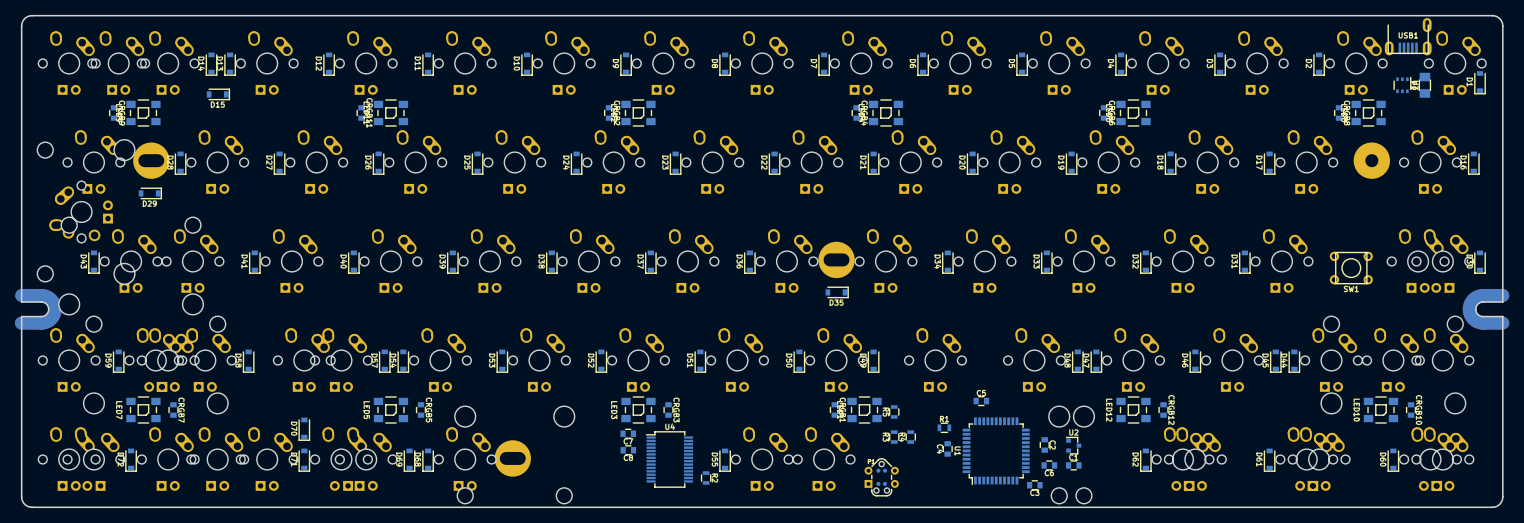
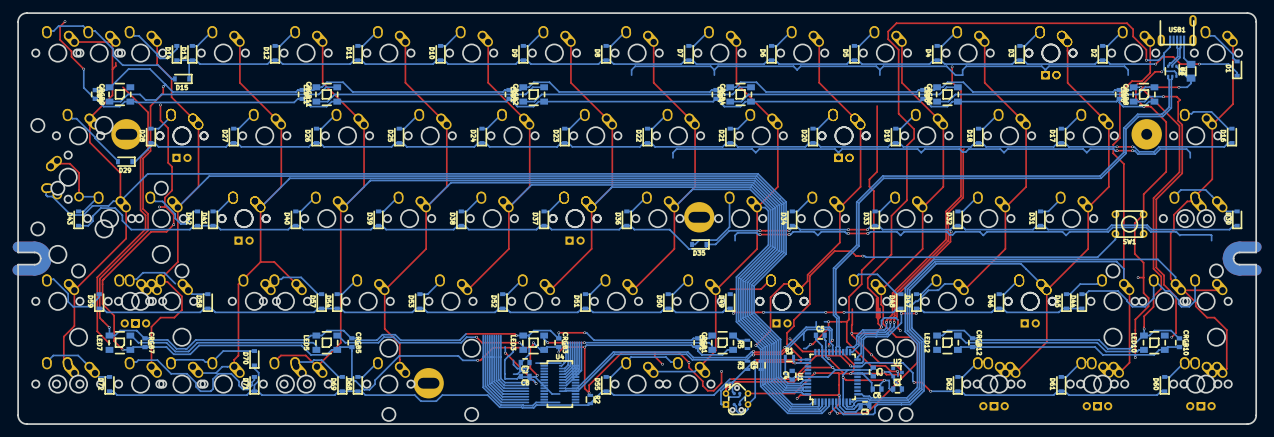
top track: none -> (65, 21) (60, 26) (60, 39) (71, 51) (71, 56) (83, 69)
via: none -> (65, 21)
bottom track: none -> (46, 30) (53, 30) (58, 26) (83, 26) (88, 30) (95, 30) (113, 49) (113, 55) (122, 65) (158, 65) (171, 78) (174, 78)
bottom track: none -> (129, 30) (134, 35) (138, 35) (160, 58) (167, 58) (176, 48) (176, 45)
bottom track: none -> (212, 30) (197, 45) (192, 45)
bottom track: none -> (295, 30) (280, 45) (275, 45)
bottom track: none -> (377, 30) (362, 45) (357, 45)
bottom track: none -> (460, 30) (445, 45) (440, 45)
bottom track: none -> (543, 30) (528, 45) (523, 45)
bottom track: none -> (626, 30) (611, 45) (606, 45)
bottom track: none -> (708, 30) (693, 45) (688, 45)
bottom track: none -> (791, 30) (776, 45) (771, 45)
bottom track: none -> (874, 30) (859, 45) (854, 45)
bottom track: none -> (957, 30) (942, 45) (937, 45)
bottom track: none -> (1039, 30) (1024, 45) (1019, 45)
bottom track: none -> (1122, 30) (1107, 45) (1102, 45)
bottom track: none -> (1205, 30) (1210, 35) (1214, 35) (1233, 54) (1233, 58) (1237, 61)
bottom track: none -> (1170, 40) (1170, 47) (1164, 53) (1164, 69) (1174, 71) (1176, 76)
bottom track: none -> (1177, 40) (1177, 56) (1168, 66)
bottom track: none -> (1180, 40) (1179, 57) (1172, 66)
bottom track: none -> (1184, 40) (1184, 58) (1191, 64)
top track: none -> (74, 42) (115, 42) (112, 45) (112, 95) (89, 118) (89, 142) (120, 173) (120, 201)
top track: none -> (157, 42) (157, 64) (171, 78) (171, 97) (192, 118)
top track: none -> (239, 42) (239, 82) (275, 118)
top track: none -> (322, 42) (322, 82) (358, 118)
top track: none -> (405, 42) (405, 82) (441, 118)
top track: none -> (488, 42) (488, 82) (523, 118)
top track: none -> (570, 42) (570, 82) (606, 118)
top track: none -> (653, 42) (653, 82) (689, 118)
top track: none -> (736, 42) (736, 83) (777, 124) (777, 186) (757, 207) (757, 248) (715, 290) (715, 350) (699, 366)
top track: none -> (819, 42) (819, 82) (854, 118)
top track: none -> (901, 42) (901, 82) (937, 118)
top track: none -> (984, 42) (984, 82) (1020, 118)
top track: none -> (1067, 42) (1067, 82) (1103, 118)
top track: none -> (1150, 42) (1150, 72) (1141, 81) (1132, 81) (1119, 93) (1119, 138) (1113, 144) (1113, 153) (1123, 163) (1123, 283)
top track: none -> (1232, 42) (1232, 104) (1212, 124) (1212, 179) (1173, 214) (1173, 229) (1170, 232) (1170, 279) (1175, 283)
part: none -> (1050, 52)
bottom track: none -> (1164, 54) (1158, 60) (1146, 60)
bottom track: none -> (176, 60) (196, 60) (199, 64) (267, 64) (271, 60) (278, 60) (282, 64) (350, 64) (354, 60) (361, 60) (365, 64) (433, 64) (436, 60) (444, 60) (448, 64) (515, 64) (519, 60) (527, 60) (530, 64) (598, 64) (602, 60) (609, 60) (613, 64) (681, 64) (685, 60) (692, 60) (696, 64) (764, 64) (767, 60) (775, 60) (779, 64) (846, 64) (850, 60) (858, 60) (861, 64) (929, 64) (933, 60) (940, 60) (944, 64) (1012, 64) (1016, 60) (1023, 60) (1027, 64) (1095, 64) (1098, 60) (1106, 60) (1110, 64) (1155, 64)
bottom track: none -> (192, 60) (189, 63) (189, 78)
top track: none -> (1146, 60) (1146, 49) (1133, 36) (1133, 29) (1127, 23) (896, 23) (888, 31) (888, 39) (898, 49) (898, 113) (914, 129) (914, 138) (906, 145) (906, 200) (891, 215) (891, 254) (867, 278) (867, 287) (878, 298) (878, 323) (881, 327) (875, 333) (851, 333)
via: none -> (1146, 60)
top track: none -> (115, 62) (112, 69)
via: none -> (1155, 64)
top track: none -> (1199, 64) (1180, 64) (1173, 56) (1162, 56) (1155, 64)
bottom track: none -> (1199, 64) (1228, 64) (1237, 72) (1237, 75)
via: none -> (1199, 64)
top track: none -> (952, 66) (952, 82) (960, 91) (960, 196) (946, 211) (946, 239) (892, 293) (892, 314) (886, 322)
via: none -> (952, 66)
bottom track: none -> (1176, 66) (1187, 78) (1191, 78) (1191, 83) (1187, 87) (1178, 87)
bottom track: none -> (83, 69) (83, 87) (103, 106) (119, 106) (124, 101) (294, 102) (297, 98) (302, 98) (310, 106) (326, 106) (331, 101) (506, 101) (509, 98) (517, 106) (533, 106) (538, 101) (713, 101) (716, 98) (724, 106) (740, 106) (745, 101) (920, 101) (922, 98) (931, 106) (947, 106) (952, 101) (1116, 101) (1119, 98) (1119, 102) (1123, 106) (1143, 106) (1148, 101) (1154, 101)
via: none -> (83, 69)
bottom track: none -> (714, 69) (710, 66) (635, 66) (631, 69) (631, 75)
bottom track: none -> (714, 69) (714, 75)
bottom track: none -> (879, 69) (876, 66) (800, 66) (797, 69) (793, 66) (717, 66) (714, 69)
bottom track: none -> (879, 69) (879, 75)
bottom track: none -> (1045, 69) (1041, 66) (966, 66) (962, 69) (962, 75) (955, 75) (946, 66) (883, 66) (879, 69)
bottom track: none -> (1045, 69) (1048, 66) (1124, 66) (1128, 69) (1128, 75)
top track: none -> (1161, 71) (1155, 71) (1143, 83) (1135, 85) (1135, 98) (1143, 106) (1150, 106) (1166, 122) (1166, 171) (1143, 194) (1143, 214) (1134, 223) (1134, 253) (1143, 262) (1143, 293) (1148, 298) (1148, 306) (1135, 319) (1135, 357)
via: none -> (1161, 71)
part: (69, 89) -> none
part: (118, 89) -> none
part: (168, 89) -> none
part: (267, 89) -> none
part: (366, 89) -> none
part: (465, 89) -> none
part: (564, 89) -> none
part: (663, 89) -> none
part: (762, 89) -> none
part: (861, 89) -> none
part: (960, 89) -> none
part: (1059, 89) -> none
part: (1158, 89) -> none
part: (1356, 89) -> none
part: (1455, 89) -> none
bottom track: none -> (1168, 76) (1169, 107) (1161, 114) (1137, 114) (1123, 128) (1123, 152) (1100, 176) (882, 176) (856, 202) (856, 245) (833, 268) (833, 315) (836, 318) (836, 352)
bottom track: none -> (1172, 76) (1171, 107) (1162, 116) (1138, 116) (1125, 129) (1125, 153) (1101, 178) (883, 178) (858, 203) (858, 246) (835, 269) (835, 314) (839, 317) (839, 352)
bottom track: none -> (165, 84) (163, 86)
top track: none -> (163, 86) (163, 93) (150, 106) (150, 150) (143, 158) (143, 208) (148, 213) (148, 230) (99, 278) (99, 317) (109, 327)
via: none -> (163, 86)
top track: none -> (122, 87) (148, 112) (148, 149) (140, 157) (140, 210) (145, 215) (145, 229) (97, 277) (97, 331) (109, 343)
bottom track: none -> (337, 87) (325, 87) (318, 94) (161, 94) (156, 99) (145, 99) (140, 94) (127, 94) (120, 101) (109, 101)
bottom track: none -> (544, 87) (532, 87) (525, 94) (334, 94) (327, 101) (316, 101)
bottom track: none -> (751, 87) (739, 87) (732, 94) (541, 94) (534, 101) (523, 101)
bottom track: none -> (957, 87) (946, 87) (939, 94) (748, 94) (741, 101) (730, 101)
bottom track: none -> (1140, 87) (1133, 87) (1130, 90) (1114, 90) (1113, 91) (973, 91) (963, 82) (947, 82) (942, 87) (937, 87) (934, 90) (918, 90) (916, 91) (766, 91) (756, 82) (740, 82) (735, 87) (730, 87) (727, 90) (711, 90) (709, 91) (559, 91) (549, 82) (533, 82) (528, 87) (523, 87) (520, 90) (504, 90) (502, 91) (352, 91) (343, 82) (326, 82) (321, 87) (316, 87) (313, 90) (297, 90) (296, 91) (172, 91) (149, 69) (128, 69) (106, 90) (95, 90)
via: none -> (1140, 87)
bottom track: none -> (1154, 87) (1145, 87) (1138, 94) (955, 94) (948, 101) (937, 101)
top track: none -> (1178, 87) (1140, 87) (1179, 125) (1179, 172) (1153, 198) (1153, 268) (1161, 276) (1161, 288) (1153, 296) (1153, 306) (1144, 316) (1144, 328)
via: none -> (1178, 87)
top track: none -> (1163, 96) (1176, 96) (1180, 99) (1178, 101) (1178, 120) (1182, 124) (1182, 173) (1156, 199) (1156, 267) (1164, 275) (1164, 284) (1176, 296) (1176, 332) (1171, 337)
bottom track: none -> (1163, 96) (1149, 96) (1144, 101) (1133, 101)
via: none -> (1163, 96)
top track: none -> (160, 104) (160, 120) (168, 128) (168, 162) (172, 166) (172, 190) (164, 197) (164, 206)
via: none -> (160, 104)
top track: none -> (877, 106) (877, 171) (869, 179) (869, 186) (873, 190) (873, 258) (861, 270) (861, 284) (848, 296) (848, 319) (846, 321)
via: none -> (1143, 106)
bottom track: none -> (67, 113) (72, 118) (76, 118) (117, 161)
bottom track: none -> (253, 113) (238, 128) (233, 128)
bottom track: none -> (336, 113) (321, 128) (316, 128)
bottom track: none -> (419, 113) (404, 128) (399, 128)
bottom track: none -> (501, 113) (487, 128) (481, 128)
bottom track: none -> (584, 113) (569, 128) (564, 128)
bottom track: none -> (667, 113) (652, 128) (647, 128)
bottom track: none -> (833, 113) (818, 128) (813, 128)
bottom track: none -> (915, 113) (900, 128) (895, 128)
bottom track: none -> (998, 113) (983, 128) (978, 128)
bottom track: none -> (1081, 113) (1066, 128) (1061, 128)
bottom track: none -> (1184, 113) (1211, 111) (1228, 128) (1231, 128)
bottom track: none -> (171, 116) (158, 128) (150, 128)
bottom track: none -> (750, 116) (738, 128) (730, 128)
top track: none -> (198, 124) (198, 186) (177, 207) (177, 262) (160, 279)
top track: none -> (281, 124) (281, 186) (260, 207) (260, 262)
top track: none -> (364, 124) (364, 186) (340, 210) (340, 342) (316, 366) (305, 355) (280, 355) (274, 362)
top track: none -> (446, 124) (446, 186) (426, 207) (426, 248) (384, 290) (384, 328) (399, 343) (399, 366)
top track: none -> (529, 124) (529, 186) (508, 207) (508, 248) (467, 290)
top track: none -> (612, 124) (612, 186) (591, 207) (591, 248) (550, 290)
top track: none -> (695, 124) (695, 186) (674, 207) (674, 248) (633, 290)
top track: none -> (860, 124) (860, 186) (839, 207) (839, 242) (807, 274) (807, 281) (798, 290)
top track: none -> (943, 124) (943, 186) (922, 207) (922, 248) (881, 290) (883, 323) (896, 337) (910, 337) (917, 343) (917, 362) (866, 413) (837, 413)
top track: none -> (1026, 124) (1026, 186) (1005, 207) (1005, 248) (964, 290)
top track: none -> (1108, 124) (1108, 186) (1088, 207) (1088, 248) (1046, 290) (1046, 342) (1015, 373)
part: none -> (181, 135)
part: none -> (844, 135)
bottom track: none -> (1231, 142) (1228, 142) (1224, 146) (1159, 146) (1154, 151) (1139, 151) (1132, 146)
bottom track: none -> (1117, 146) (1068, 146) (1064, 142) (1057, 142) (1053, 146) (986, 146) (982, 142) (974, 142) (970, 146) (903, 146) (899, 142) (892, 142) (888, 146) (820, 146) (816, 142) (809, 142) (805, 146) (737, 146) (733, 142) (726, 142) (722, 146) (655, 146) (651, 142) (643, 142) (639, 146) (572, 146) (568, 142) (561, 142) (557, 146) (489, 146) (485, 142) (478, 142) (474, 146) (406, 146) (402, 142) (395, 142) (391, 146) (324, 146) (320, 142) (312, 142) (308, 146) (241, 146) (237, 142) (229, 142) (226, 146) (158, 146) (154, 142) (150, 142) (150, 146) (135, 161) (132, 161)
via: none -> (1117, 146)
top track: none -> (1132, 146) (1117, 146)
via: none -> (1132, 146)
top track: none -> (963, 149) (963, 197) (948, 212) (948, 240) (894, 294) (894, 315) (890, 322)
bottom track: none -> (1117, 150) (1090, 149) (1086, 152) (1083, 149) (1007, 149) (1004, 152) (1000, 149) (968, 149) (965, 152) (959, 149) (924, 149) (921, 152) (917, 149) (842, 149) (838, 152)
via: none -> (1117, 150)
top track: none -> (1132, 150) (1117, 150)
bottom track: none -> (1132, 150) (1138, 154) (1155, 154) (1160, 149) (1186, 149) (1190, 152) (1190, 157)
via: none -> (1132, 150)
bottom track: none -> (838, 152) (834, 149) (759, 149) (755, 152) (752, 149) (676, 149) (673, 152) (673, 157)
part: (93, 188) -> none
part: (316, 188) -> none
part: (415, 188) -> none
part: (514, 188) -> none
part: (613, 188) -> none
part: (712, 188) -> none
part: (811, 188) -> none
part: (910, 188) -> none
part: (1108, 188) -> none
part: (1207, 188) -> none
part: (1306, 188) -> none
part: (1430, 188) -> none
top track: none -> (57, 160) (60, 163) (69, 163) (79, 172) (79, 196)
part: (107, 211) -> none
bottom track: none -> (46, 188) (47, 196) (57, 196)
bottom track: none -> (52, 196) (70, 215) (83, 215) (92, 205) (108, 205) (113, 201) (120, 201) (147, 173) (757, 173) (786, 202) (786, 253) (754, 285) (754, 312) (780, 339) (780, 376) (787, 383) (800, 383) (803, 380) (807, 380)
bottom track: none -> (98, 196) (83, 211) (78, 211)
bottom track: none -> (98, 196) (79, 196)
bottom track: none -> (150, 196) (155, 201) (162, 201) (175, 214) (175, 218) (180, 223) (186, 223) (189, 221) (189, 216) (193, 211) (197, 211)
bottom track: none -> (233, 196) (218, 211) (213, 211)
bottom track: none -> (315, 196) (300, 211) (295, 211)
bottom track: none -> (398, 196) (383, 211) (378, 211)
bottom track: none -> (481, 196) (466, 211) (461, 211)
bottom track: none -> (564, 196) (549, 211) (544, 211)
bottom track: none -> (646, 196) (631, 211) (626, 211)
bottom track: none -> (729, 196) (729, 227) (716, 240) (699, 240) (695, 244) (692, 244)
bottom track: none -> (812, 196) (797, 211) (792, 211)
bottom track: none -> (895, 196) (880, 211) (875, 211)
bottom track: none -> (977, 196) (962, 211) (957, 211)
bottom track: none -> (1174, 196) (1180, 189) (1205, 189) (1216, 201)
bottom track: none -> (1060, 199) (1048, 211) (1040, 211)
top track: none -> (159, 206) (165, 206) (173, 214) (173, 224) (166, 231) (151, 231) (102, 280) (102, 304) (114, 315) (114, 341) (122, 349)
via: none -> (159, 206)
top track: none -> (126, 207) (126, 238) (74, 290) (74, 326) (63, 336) (63, 361) (68, 366)
bottom track: none -> (177, 207) (209, 176) (756, 176) (783, 203) (783, 252) (751, 284) (751, 314) (778, 340) (778, 377) (786, 385) (807, 383)
bottom track: none -> (260, 207) (289, 178) (755, 178) (781, 204) (781, 251) (749, 283) (749, 315) (776, 341) (776, 378) (785, 387) (807, 387)
bottom track: none -> (343, 207) (370, 180) (754, 180) (779, 205) (779, 250) (747, 282) (747, 316) (773, 342) (773, 379) (784, 390) (807, 390)
bottom track: none -> (426, 207) (450, 182) (753, 182) (777, 206) (777, 249) (745, 281) (745, 317) (771, 343) (771, 380) (783, 392) (807, 394)
bottom track: none -> (508, 207) (531, 184) (752, 184) (775, 207) (775, 248) (743, 280) (743, 318) (769, 344) (769, 381) (792, 404) (810, 404) (815, 401)
bottom track: none -> (591, 207) (612, 187) (751, 187) (772, 208) (772, 247) (740, 279) (740, 319) (767, 346) (767, 382) (791, 406) (818, 406) (818, 401)
bottom track: none -> (674, 207) (692, 189) (750, 189) (770, 209) (770, 246) (738, 278) (738, 320) (765, 347) (765, 384) (789, 408) (819, 408) (822, 406) (822, 401)
bottom track: none -> (757, 207) (765, 207) (768, 210) (768, 245) (736, 277) (736, 321) (762, 348) (762, 385) (788, 411) (820, 411) (825, 406) (825, 401)
bottom track: none -> (1222, 207) (1226, 211) (1237, 211)
part: none -> (244, 218)
part: none -> (575, 218)
part: none -> (197, 219)
via: none -> (173, 224)
bottom track: none -> (78, 225) (88, 225) (92, 221) (92, 216) (100, 208) (115, 208) (122, 215) (122, 220) (131, 229) (189, 229) (193, 225) (216, 225) (220, 229) (288, 229) (292, 225) (299, 225) (303, 229) (370, 229) (374, 225) (382, 225) (386, 229) (453, 229) (457, 225) (464, 225) (468, 229) (536, 229) (540, 225) (547, 225) (551, 229) (619, 229) (623, 225) (630, 225) (634, 229) (669, 229) (689, 248) (705, 248) (706, 244) (715, 244) (729, 230) (760, 230)
bottom track: none -> (1237, 225) (1233, 225) (1229, 229) (1151, 229) (1147, 225) (1111, 225) (1107, 229) (1048, 229) (1044, 225) (1036, 225) (1033, 229) (965, 229) (961, 225) (954, 225) (949, 229) (951, 231)
bottom track: none -> (848, 229) (799, 229) (796, 225) (792, 225) (789, 230)
via: none -> (848, 229)
top track: none -> (867, 229) (848, 229)
via: none -> (867, 229)
bottom track: none -> (950, 229) (882, 229) (878, 225) (871, 225) (867, 229)
via: none -> (760, 230)
top track: none -> (789, 230) (760, 230)
via: none -> (789, 230)
top track: none -> (951, 231) (950, 241) (896, 295) (896, 316) (894, 322)
via: none -> (951, 231)
bottom track: none -> (848, 233) (821, 231) (817, 235) (814, 231) (793, 231) (789, 234)
via: none -> (848, 233)
top track: none -> (867, 233) (848, 233)
bottom track: none -> (867, 233) (896, 231) (900, 235) (904, 231) (946, 231) (952, 234) (955, 231) (979, 231) (983, 235) (986, 231) (1062, 231) (1066, 235) (1069, 231) (1108, 231) (1112, 227) (1146, 227) (1150, 231) (1176, 231) (1179, 235) (1211, 234) (1211, 240)
via: none -> (867, 233)
bottom track: none -> (1115, 233) (1115, 239) (1097, 257) (862, 256)
bottom track: none -> (760, 234) (737, 232) (735, 235) (735, 240)
via: none -> (760, 234)
top track: none -> (789, 234) (760, 234)
via: none -> (789, 234)
part: (131, 287) -> none
part: (192, 287) -> none
part: (390, 287) -> none
part: (489, 287) -> none
part: (588, 287) -> none
part: (786, 287) -> none
part: (885, 287) -> none
part: (984, 287) -> none
part: (1083, 287) -> none
part: (1182, 287) -> none
part: (1281, 287) -> none
part: (1418, 287) -> none
part: (1442, 287) -> none
top track: none -> (862, 256) (856, 256) (851, 251) (834, 251) (809, 275) (809, 304) (793, 320) (793, 326) (787, 332) (787, 344) (801, 358) (801, 361) (799, 363) (757, 362) (755, 364)
via: none -> (862, 256)
top track: none -> (260, 262) (274, 262) (296, 283)
top track: none -> (260, 262) (238, 284) (238, 355) (234, 359) (234, 366)
via: none -> (1138, 277)
top track: none -> (1143, 277) (1138, 277)
bottom track: none -> (46, 279) (53, 279) (68, 293) (68, 301) (73, 306) (89, 306) (99, 297) (99, 294)
bottom track: none -> (119, 279) (136, 279) (143, 272) (164, 272) (175, 283)
bottom track: none -> (357, 279) (342, 294) (337, 294)
bottom track: none -> (522, 279) (507, 294) (502, 294)
bottom track: none -> (605, 279) (590, 294) (585, 294)
bottom track: none -> (688, 279) (673, 294) (668, 294)
top track: none -> (770, 279) (761, 289) (730, 289)
bottom track: none -> (853, 279) (858, 274) (877, 274) (897, 294) (900, 294)
bottom track: none -> (936, 279) (921, 294) (916, 294)
bottom track: none -> (1019, 279) (1004, 294) (999, 294)
bottom track: none -> (1101, 279) (1097, 284) (1080, 284) (1070, 294) (1066, 294)
bottom track: none -> (1195, 279) (1195, 300) (1189, 306) (1181, 306) (1178, 300) (1169, 291) (1165, 291) (1153, 279) (1153, 298) (1145, 306) (1132, 306) (1117, 291) (1088, 291) (1085, 294) (1081, 294)
top track: none -> (160, 281) (167, 281) (181, 296) (181, 310) (174, 317) (160, 317) (151, 326) (151, 366)
bottom track: none -> (440, 281) (427, 294) (419, 294)
bottom track: none -> (265, 283) (269, 284) (274, 279) (283, 277) (301, 277) (317, 294) (321, 294)
top track: none -> (792, 283) (784, 283) (770, 297) (770, 330) (755, 345)
bottom track: none -> (958, 283) (944, 283) (938, 290) (928, 290) (911, 305) (911, 328) (924, 340) (924, 390) (910, 404) (877, 404) (873, 414) (843, 414) (836, 407) (836, 401)
bottom track: none -> (1041, 283) (1020, 263) (936, 263) (909, 290) (909, 329) (921, 341) (921, 389) (909, 402) (856, 400) (852, 406) (847, 406) (846, 401)
bottom track: none -> (1123, 283) (1123, 268) (1116, 261) (935, 261) (907, 289) (907, 330) (919, 342) (919, 388) (908, 400) (855, 398) (850, 401)
bottom track: none -> (1175, 283) (1175, 277) (1157, 259) (933, 259) (905, 288) (905, 331) (917, 343) (917, 387) (906, 397) (871, 397) (857, 394)
bottom track: none -> (188, 290) (192, 294) (207, 294)
top track: none -> (1129, 290) (1129, 362) (1119, 373)
top track: none -> (1183, 290) (1207, 317) (1214, 317) (1226, 329) (1226, 368) (1222, 373)
top track: none -> (1222, 290) (1181, 290)
top track: none -> (876, 298) (876, 317) (878, 318) (879, 308)
part: none -> (781, 300)
part: none -> (1030, 300)
bottom track: none -> (99, 308) (102, 308) (106, 312) (200, 312) (204, 308) (211, 308) (215, 312) (314, 312) (317, 308) (340, 308) (344, 312) (412, 312) (416, 308) (423, 308) (427, 312) (495, 312) (498, 308) (506, 308) (510, 312) (577, 312) (581, 308) (589, 308) (592, 312) (660, 312) (664, 308) (671, 308) (675, 312) (722, 312) (726, 308) (730, 308) (733, 313)
top track: none -> (852, 309) (851, 334) (879, 363) (894, 363) (900, 369) (900, 372) (899, 374) (886, 374) (883, 371) (882, 373) (839, 373)
bottom track: none -> (1081, 308) (1062, 308) (1058, 312) (1006, 312) (1002, 308) (995, 308) (991, 312) (924, 312) (920, 308) (916, 308) (916, 313)
top track: none -> (763, 312) (733, 313)
via: none -> (763, 312)
bottom track: none -> (825, 312) (763, 312)
via: none -> (825, 312)
top track: none -> (844, 312) (825, 312)
bottom track: none -> (844, 312) (893, 312) (897, 308) (900, 308) (901, 322) (887, 336) (866, 336) (863, 339) (863, 361) (857, 363)
via: none -> (844, 312)
via: none -> (733, 313)
via: none -> (901, 313)
top track: none -> (916, 313) (901, 313)
via: none -> (916, 313)
top track: none -> (897, 319) (897, 328) (900, 330)
bottom track: none -> (897, 319) (895, 317) (884, 317) (881, 320) (881, 327)
bottom track: none -> (816, 321) (816, 327)
bottom track: none -> (828, 321) (824, 321)
via: none -> (828, 321)
top track: none -> (846, 321) (846, 341) (871, 365) (885, 365) (890, 371) (897, 371)
top track: none -> (846, 321) (828, 321) (828, 328) (810, 344)
bottom track: none -> (886, 322) (886, 327) (884, 330) (862, 330) (856, 336) (856, 344) (853, 347) (847, 347) (846, 352)
via: none -> (886, 322)
bottom track: none -> (890, 322) (890, 327) (885, 332) (863, 332) (858, 337) (858, 345) (850, 352)
via: none -> (890, 322)
bottom track: none -> (894, 322) (894, 326) (886, 334) (864, 334) (861, 338) (861, 353) (857, 359)
via: none -> (894, 322)
part: (69, 386) -> none
part: (205, 386) -> none
part: (304, 386) -> none
part: (341, 386) -> none
part: (440, 386) -> none
part: (539, 386) -> none
part: (638, 386) -> none
part: (737, 386) -> none
part: (836, 386) -> none
part: (935, 386) -> none
part: (1034, 386) -> none
part: (1133, 386) -> none
part: (1331, 386) -> none
part: (1393, 386) -> none
bottom track: none -> (109, 327) (109, 335) (115, 335) (120, 330) (136, 330) (144, 338) (167, 339) (176, 348) (186, 348) (195, 339) (306, 339) (310, 335) (321, 335) (326, 330) (343, 330) (351, 338) (358, 340) (377, 340) (382, 334) (395, 334) (400, 340) (459, 340) (466, 333)
via: none -> (109, 327)
via: none -> (881, 327)
bottom track: none -> (1144, 328) (1143, 335)
via: none -> (1144, 328)
via: none -> (900, 330)
bottom track: none -> (558, 332) (558, 338) (550, 330) (533, 330) (528, 335)
via: none -> (558, 332)
top track: none -> (584, 332) (558, 332)
bottom track: none -> (584, 332) (594, 340) (691, 340) (693, 338) (709, 338) (712, 335)
via: none -> (584, 332)
bottom track: none -> (803, 332) (803, 340)
via: none -> (851, 333)
top track: none -> (466, 333) (514, 333) (516, 335)
bottom track: none -> (130, 335) (138, 342) (166, 342) (175, 351) (188, 351) (197, 342) (313, 342) (316, 345) (316, 349)
bottom track: none -> (337, 335) (345, 342) (378, 342) (383, 337) (393, 337) (399, 342) (461, 342) (466, 337) (476, 337)
bottom track: none -> (483, 335) (483, 387) (500, 405) (532, 405) (536, 402) (559, 402)
bottom track: none -> (485, 335) (485, 386) (501, 402) (528, 402)
bottom track: none -> (487, 335) (487, 385) (502, 399) (528, 399)
bottom track: none -> (489, 335) (489, 384) (502, 396) (528, 396)
bottom track: none -> (492, 335) (492, 382) (503, 393) (528, 393)
bottom track: none -> (494, 335) (494, 381) (503, 391) (528, 391)
bottom track: none -> (496, 335) (496, 380) (504, 388) (528, 388)
bottom track: none -> (498, 335) (498, 379) (504, 385) (528, 385)
bottom track: none -> (500, 335) (500, 378) (504, 382) (528, 382)
via: none -> (516, 335)
bottom track: none -> (528, 335) (529, 354) (520, 363) (520, 371)
bottom track: none -> (544, 335) (544, 339) (547, 342)
bottom track: none -> (733, 335) (738, 340) (747, 340)
bottom track: none -> (815, 335) (815, 339) (822, 345) (822, 357) (835, 369)
bottom track: none -> (824, 335) (825, 356) (829, 358)
bottom track: none -> (937, 335) (942, 335) (947, 330) (964, 330) (972, 338) (978, 339) (1098, 339) (1107, 348) (1129, 348) (1143, 335) (1149, 335) (1154, 330) (1171, 330) (1179, 338)
bottom track: none -> (957, 335) (965, 342) (1097, 342) (1106, 351) (1143, 349)
top track: none -> (476, 337) (482, 342) (519, 342)
via: none -> (476, 337)
via: none -> (1171, 337)
top track: none -> (789, 338) (802, 351) (841, 351) (853, 364) (853, 370) (850, 373)
via: none -> (789, 338)
top track: none -> (832, 340) (829, 346)
bottom track: none -> (832, 340) (831, 329) (829, 327) (806, 327) (784, 347)
via: none -> (832, 340)
bottom track: none -> (519, 342) (523, 346) (523, 349)
via: none -> (519, 342)
top track: none -> (533, 342) (530, 347)
bottom track: none -> (533, 342) (540, 349) (546, 347) (558, 347) (558, 352)
via: none -> (533, 342)
via: none -> (547, 342)
bottom track: none -> (565, 342) (565, 361) (559, 365)
bottom track: none -> (568, 342) (568, 364) (564, 368) (559, 368)
bottom track: none -> (570, 342) (570, 365) (564, 371) (559, 371)
bottom track: none -> (572, 342) (572, 366) (565, 374) (559, 374)
bottom track: none -> (574, 342) (574, 367) (565, 377) (559, 377)
bottom track: none -> (577, 342) (577, 368) (565, 379) (559, 379)
bottom track: none -> (579, 342) (579, 369) (566, 382) (559, 382)
bottom track: none -> (581, 342) (581, 370) (566, 385) (559, 385)
top track: none -> (584, 342) (547, 342)
bottom track: none -> (584, 342) (709, 342) (712, 345) (712, 349)
via: none -> (584, 342)
bottom track: none -> (810, 344) (803, 348)
via: none -> (810, 344)
bottom track: none -> (755, 345) (760, 349) (760, 386) (787, 413) (821, 413) (829, 406) (829, 401)
via: none -> (755, 345)
via: none -> (829, 346)
bottom track: none -> (505, 347) (505, 353)
bottom track: none -> (513, 347) (513, 351) (504, 359) (504, 378) (535, 377) (537, 375)
top track: none -> (530, 347) (530, 368) (537, 375)
top track: none -> (530, 347) (493, 347) (480, 360) (477, 360)
bottom track: none -> (584, 347) (586, 345) (691, 345) (697, 347) (697, 350) (701, 354) (722, 354) (727, 349) (733, 349)
via: none -> (584, 347)
top track: none -> (784, 347) (781, 352) (753, 351)
via: none -> (784, 347)
bottom track: none -> (1179, 347) (1167, 347) (1164, 349) (1159, 349) (1154, 354) (1102, 354) (1095, 347) (960, 347) (957, 349)
bottom track: none -> (122, 349) (130, 349) (133, 347) (166, 347) (173, 354) (190, 354) (199, 345) (301, 345) (310, 354) (326, 354) (331, 349) (337, 349) (340, 347) (351, 347) (351, 379) (364, 389) (369, 389) (375, 384) (375, 380) (399, 355) (458, 355) (462, 360) (477, 360)
via: none -> (122, 349)
top track: none -> (787, 350) (782, 354) (753, 355)
bottom track: none -> (787, 350) (806, 329) (828, 329) (832, 352)
bottom track: none -> (254, 351) (223, 351) (212, 362) (205, 362) (203, 359) (175, 359) (171, 364)
bottom track: none -> (753, 351) (745, 357) (693, 357) (687, 352) (613, 352) (576, 388) (559, 388)
via: none -> (753, 351)
top track: none -> (558, 352) (563, 347) (584, 347) (584, 388) (589, 392) (589, 385) (621, 352) (679, 352) (689, 362) (689, 367) (702, 381) (702, 385) (707, 390) (713, 390) (721, 382) (721, 371)
via: none -> (558, 352)
top track: none -> (654, 352) (654, 356) (662, 364)
top track: none -> (505, 353) (536, 383)
via: none -> (505, 353)
bottom track: none -> (753, 355) (746, 359) (692, 359) (686, 354) (614, 354) (577, 390) (559, 391)
via: none -> (753, 355)
via: none -> (871, 354)
bottom track: none -> (1135, 354) (1135, 357)
bottom track: none -> (785, 357) (785, 373) (791, 379) (794, 376) (828, 376) (835, 369)
bottom track: none -> (793, 357) (795, 363) (807, 363)
via: none -> (1135, 357)
top track: none -> (829, 358) (844, 373)
via: none -> (829, 358)
bottom track: none -> (755, 359) (732, 382)
top track: none -> (798, 359) (755, 359)
bottom track: none -> (807, 359) (798, 359)
via: none -> (477, 360)
bottom track: none -> (513, 360) (513, 364) (517, 368) (528, 368)
bottom track: none -> (46, 362) (53, 355) (78, 355) (89, 366)
bottom track: none -> (129, 362) (157, 360) (171, 373) (186, 373) (195, 382) (195, 386) (200, 391) (210, 391) (213, 389) (213, 379) (218, 373) (231, 373) (238, 381) (238, 385) (242, 389) (247, 389) (252, 385) (254, 376)
bottom track: none -> (377, 362) (362, 376) (357, 376)
bottom track: none -> (677, 362) (670, 362) (666, 357) (630, 357) (611, 376) (606, 376)
via: none -> (689, 362)
bottom track: none -> (988, 362) (977, 362) (962, 376) (957, 376)
bottom track: none -> (1091, 362) (1081, 362) (1066, 376) (1061, 376)
bottom track: none -> (561, 363) (535, 363)
via: none -> (795, 363)
via: none -> (662, 364)
bottom track: none -> (755, 364) (755, 397) (748, 404) (748, 409) (743, 413) (739, 413) (736, 410) (734, 404)
bottom track: none -> (1195, 364) (1192, 362) (1184, 362) (1169, 376) (1164, 376)
bottom track: none -> (254, 365) (254, 368) (258, 372) (258, 380) (254, 385) (254, 391)
top track: none -> (850, 365) (840, 355) (816, 355) (792, 379) (729, 379)
bottom track: none -> (850, 365) (861, 366) (865, 362) (902, 362) (912, 372) (914, 382)
via: none -> (850, 365)
bottom track: none -> (234, 366) (222, 366) (216, 373) (198, 373)
bottom track: none -> (699, 366) (694, 371) (653, 373)
top track: none -> (832, 367) (808, 367) (793, 381) (732, 381) (725, 388) (725, 393)
via: none -> (832, 367)
bottom track: none -> (873, 367) (870, 369) (835, 369)
bottom track: none -> (847, 369) (843, 374) (843, 405) (846, 409) (853, 409) (858, 404) (866, 404) (870, 408)
bottom track: none -> (520, 371) (517, 374) (513, 374)
bottom track: none -> (528, 371) (520, 371)
via: none -> (721, 371)
bottom track: none -> (883, 371) (888, 371) (893, 376) (893, 379) (901, 387) (901, 391)
via: none -> (883, 371)
bottom track: none -> (897, 371) (897, 376)
via: none -> (897, 371)
bottom track: none -> (95, 373) (98, 376) (109, 376)
bottom track: none -> (301, 373) (301, 368) (295, 362) (321, 360) (338, 376) (342, 376)
via: none -> (814, 373)
top track: none -> (839, 373) (839, 403) (829, 413)
top track: none -> (839, 373) (814, 373) (794, 393) (748, 393)
bottom track: none -> (850, 373) (870, 373) (873, 376)
via: none -> (850, 373)
bottom track: none -> (862, 373) (871, 382) (871, 391)
via: none -> (537, 375)
bottom track: none -> (535, 377) (552, 393) (559, 393)
top track: none -> (843, 377) (845, 380) (884, 380)
via: none -> (843, 377)
bottom track: none -> (729, 379) (713, 395) (613, 395) (609, 391) (602, 391) (588, 405) (536, 405) (533, 407) (499, 407) (487, 395) (442, 395) (436, 401) (420, 401) (414, 395) (365, 395) (361, 391) (338, 391) (334, 395) (261, 395) (258, 391) (250, 391) (246, 395) (117, 395) (113, 391) (109, 391)
bottom track: none -> (528, 379) (533, 379) (536, 383)
via: none -> (884, 380)
bottom track: none -> (732, 382) (729, 382) (721, 391) (721, 403) (725, 404)
bottom track: none -> (732, 382) (734, 393)
top track: none -> (914, 382) (921, 382) (930, 391)
via: none -> (914, 382)
via: none -> (536, 383)
bottom track: none -> (892, 391) (889, 388) (889, 380) (884, 380) (880, 384) (880, 391)
via: none -> (930, 391)
bottom track: none -> (1164, 391) (1161, 391) (1157, 395) (1068, 395) (1064, 391) (1057, 391) (1053, 395) (965, 395) (961, 391) (930, 391)
via: none -> (589, 392)
bottom track: none -> (739, 393) (738, 397) (729, 397) (725, 393)
bottom track: none -> (748, 393) (739, 401) (739, 404)
top track: none -> (839, 395) (800, 395) (797, 398)
bottom track: none -> (839, 395) (839, 406) (845, 411) (855, 411) (861, 408)
via: none -> (839, 395)
via: none -> (797, 398)
bottom track: none -> (832, 401) (832, 408) (837, 413)
part: (69, 485) -> none
part: (93, 485) -> none
part: (168, 485) -> none
part: (217, 485) -> none
part: (267, 485) -> none
part: (341, 485) -> none
part: (366, 485) -> none
part: (465, 485) -> none
part: (762, 485) -> none
part: (824, 485) -> none
via: none -> (829, 413)
via: none -> (837, 413)

